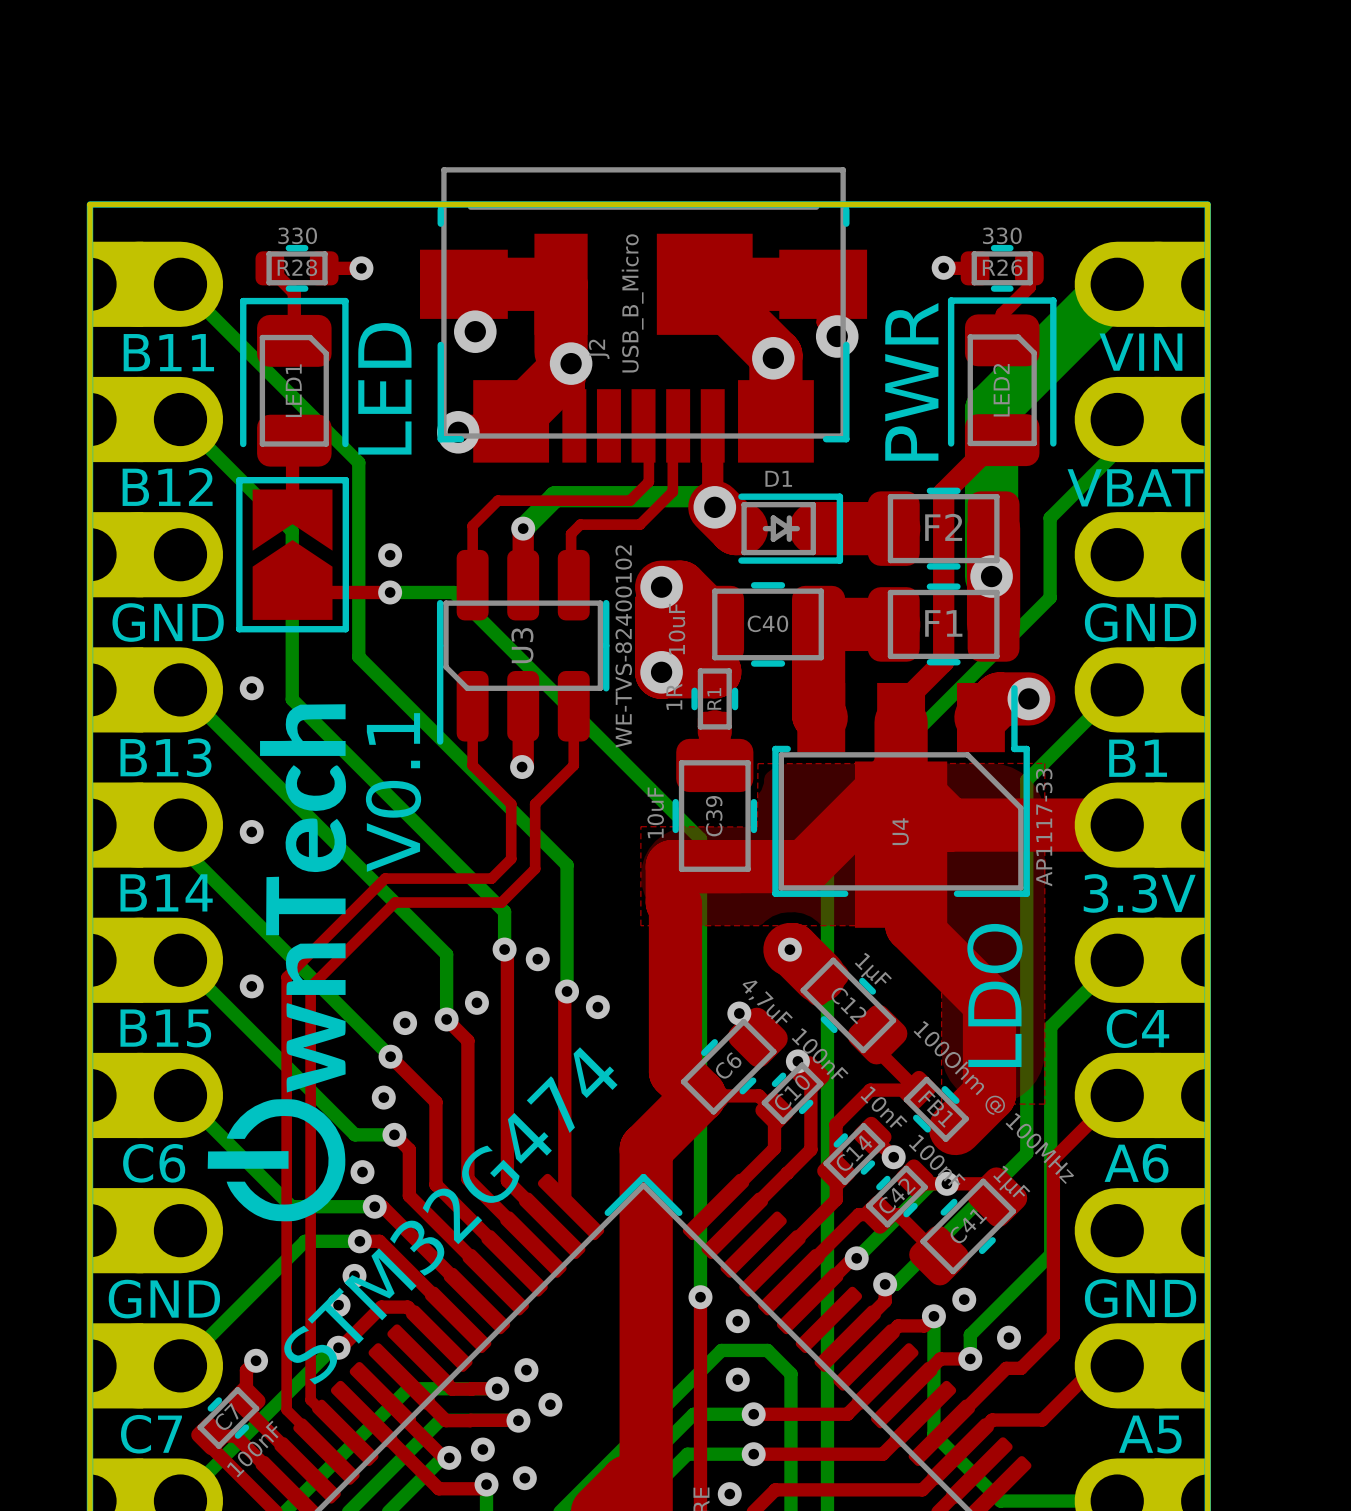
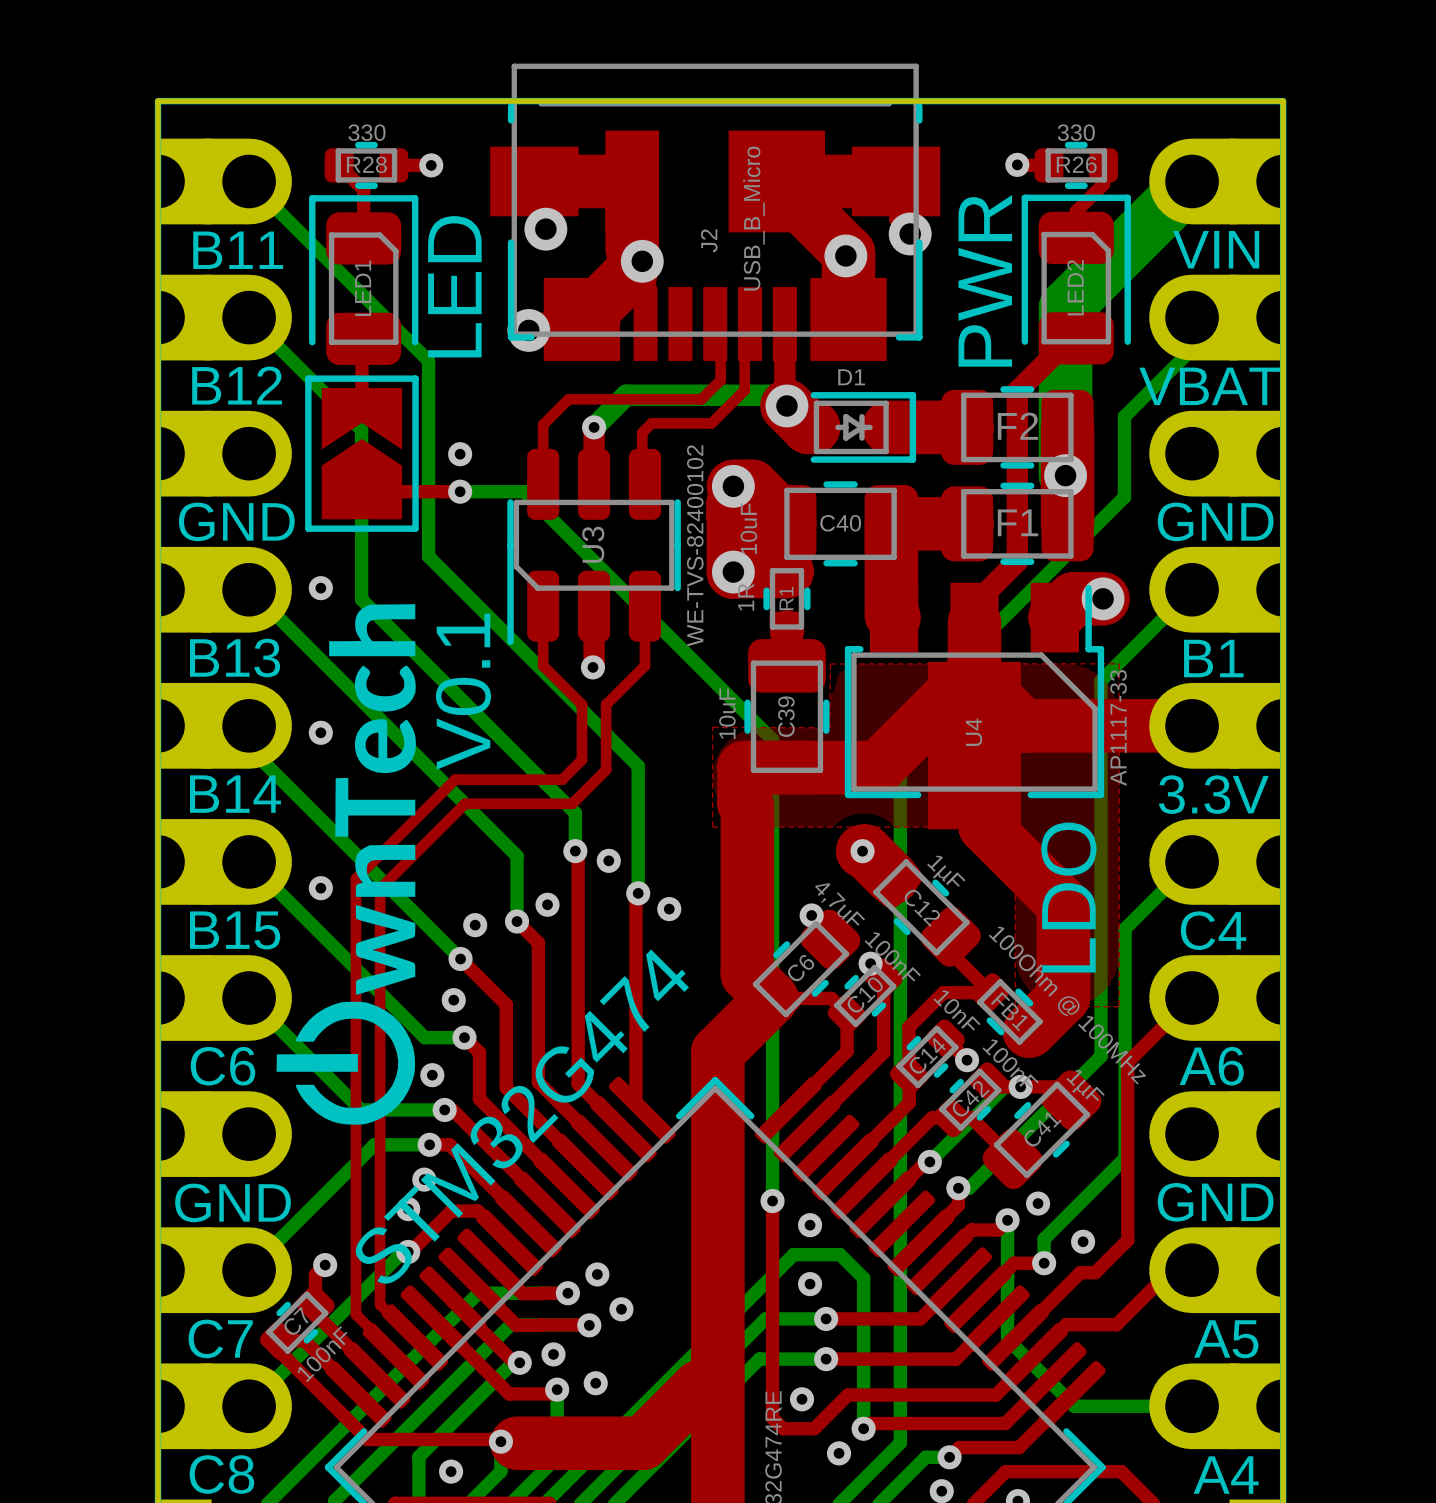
J2 value position: USB_B_Micro (632, 303) -> USB_B_Micro (754, 218)
J2 name position: J2 (599, 349) -> J2 (709, 240)

